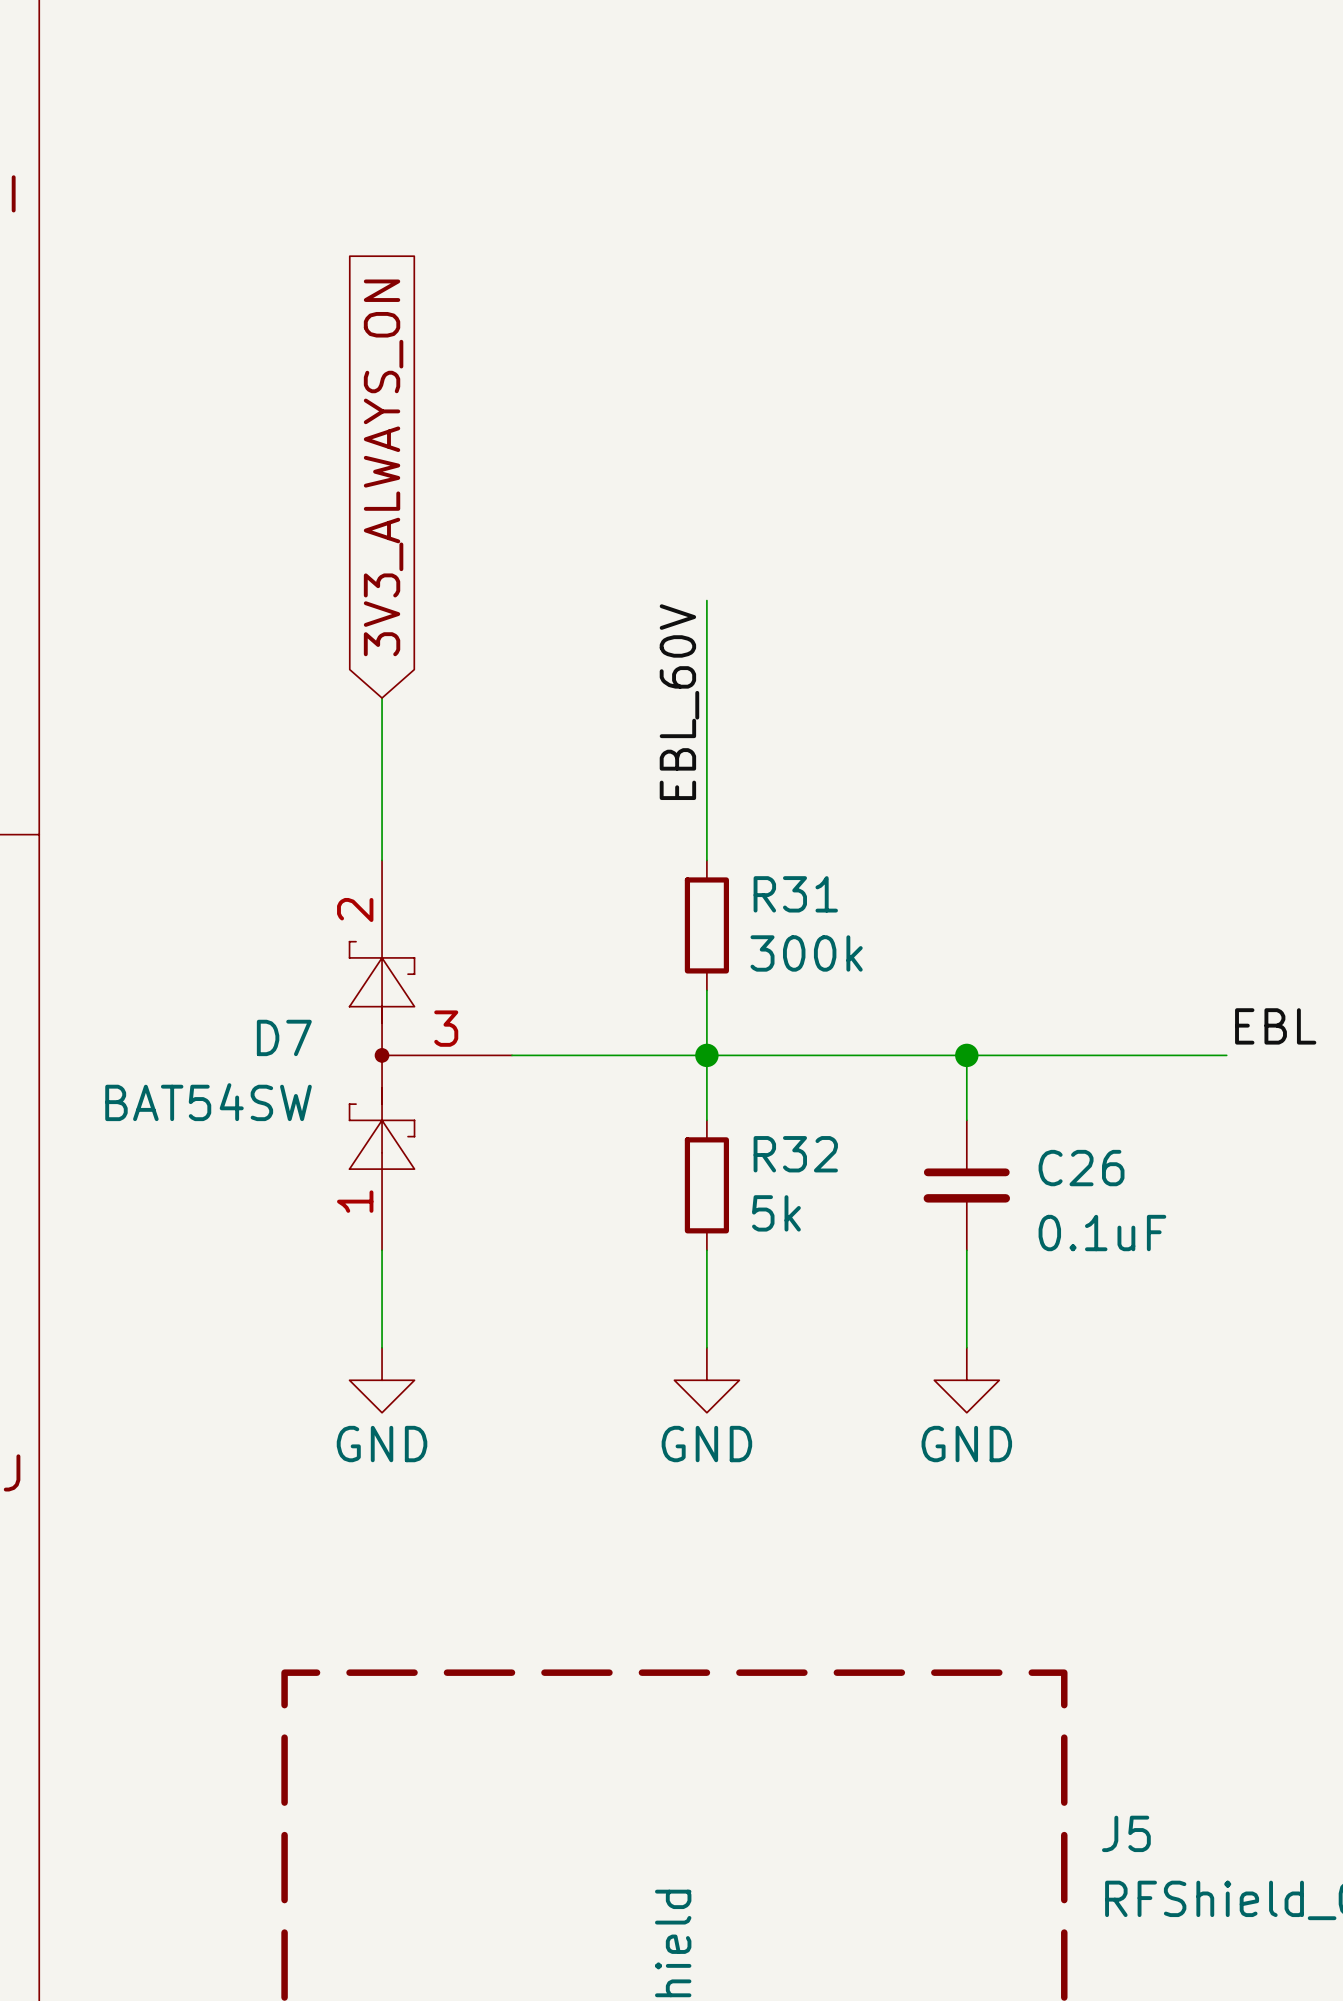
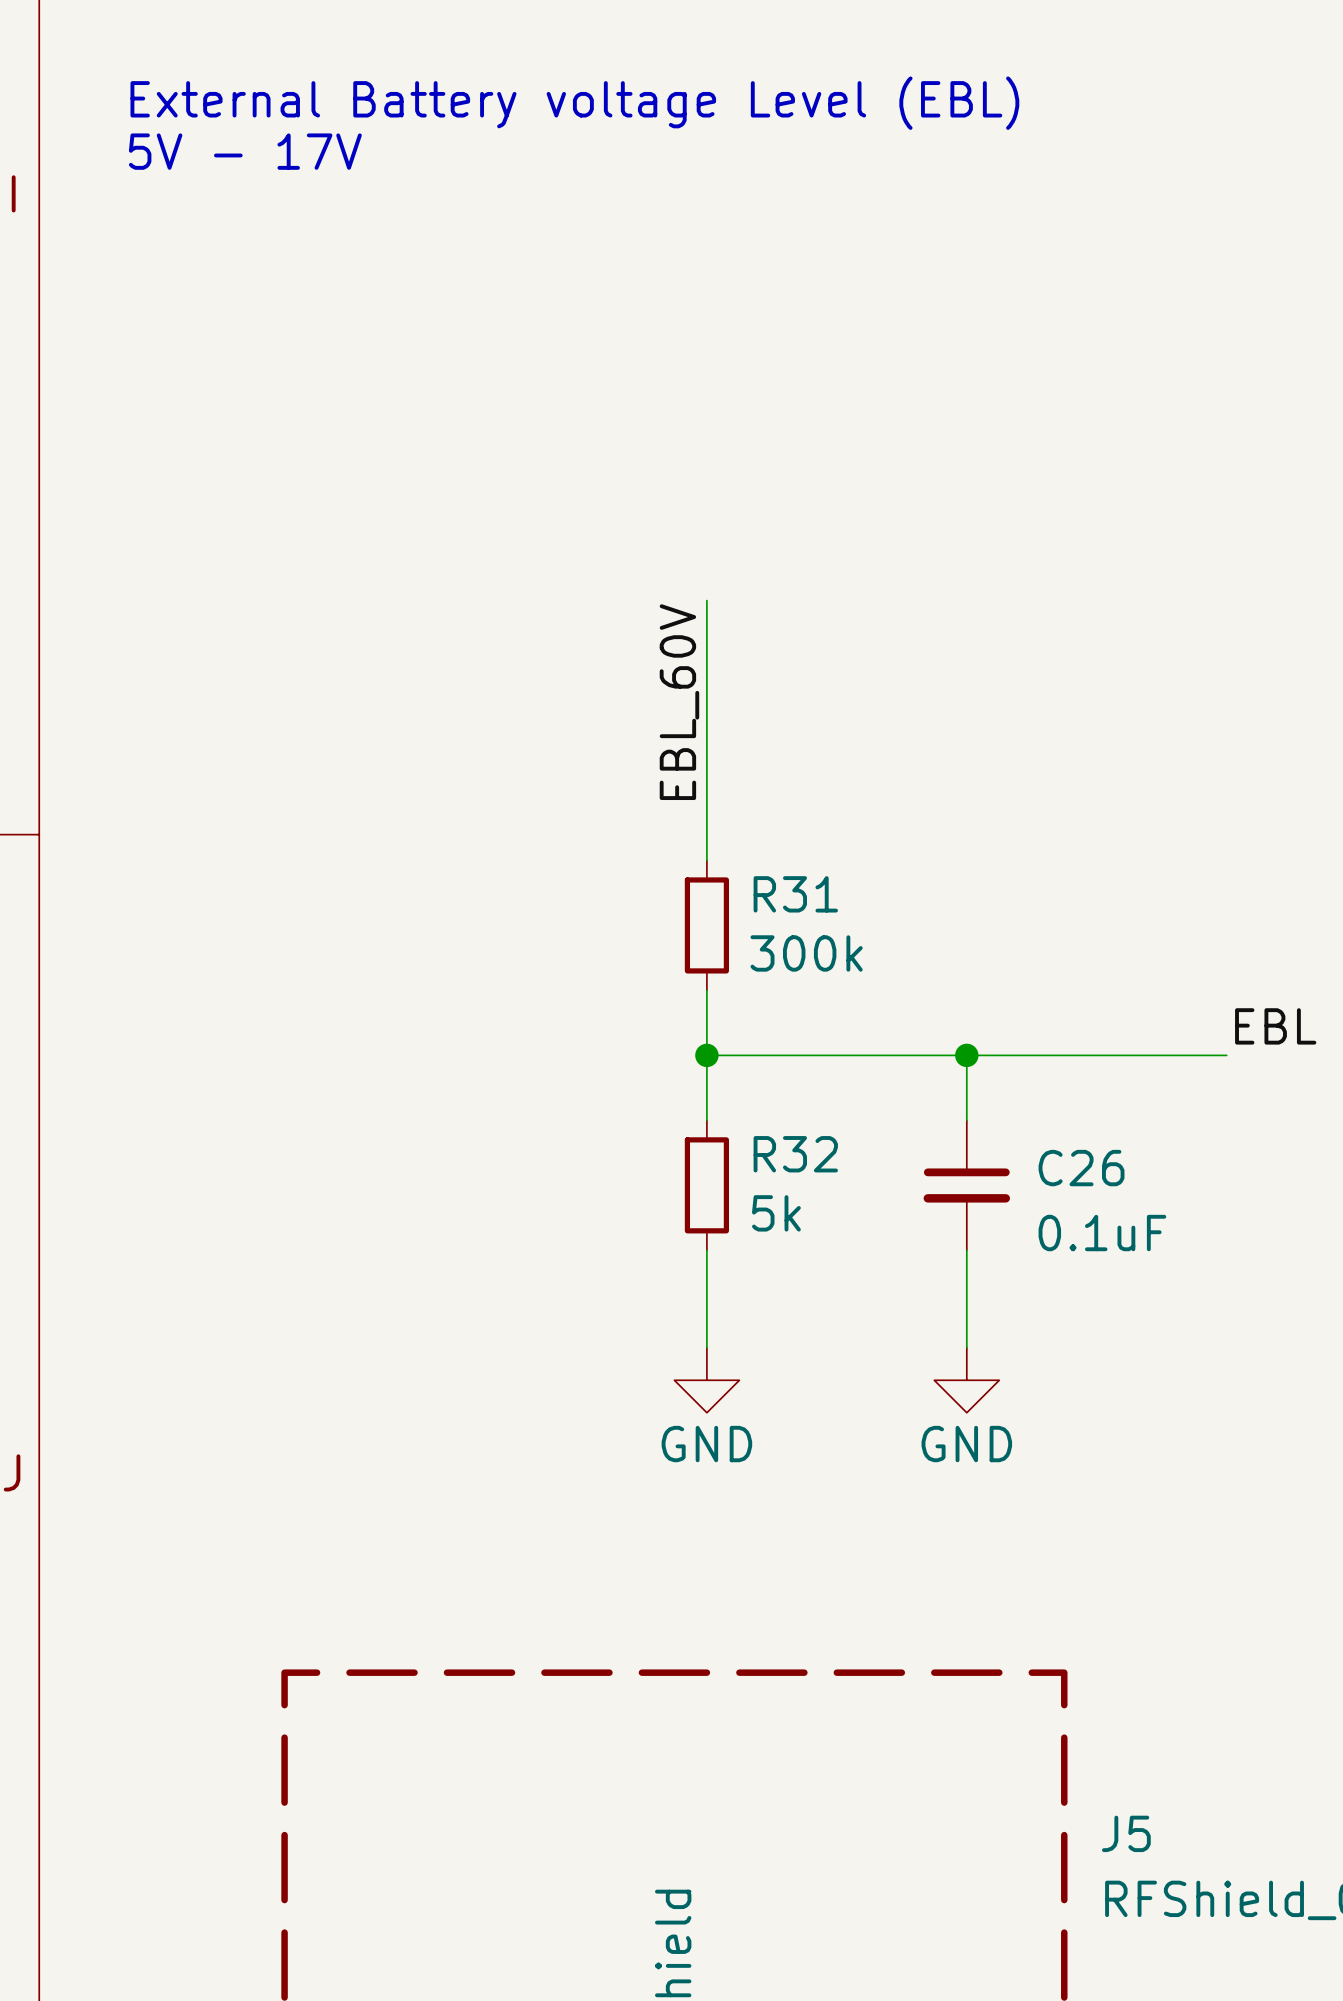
text: none -> External Battery voltage Level (EBL) (574, 103)
text: none -> 5V - 17V (245, 151)
global label: 3V3_ALWAYS_ON (383, 467) -> none
wire: (382, 698) (382, 860) -> none
D7: BAT54SW (430, 1055) -> none
wire: (511, 1055) (706, 1055) -> none
wire: (382, 1250) (382, 1347) -> none
power symbol: GND (382, 1380) -> none

